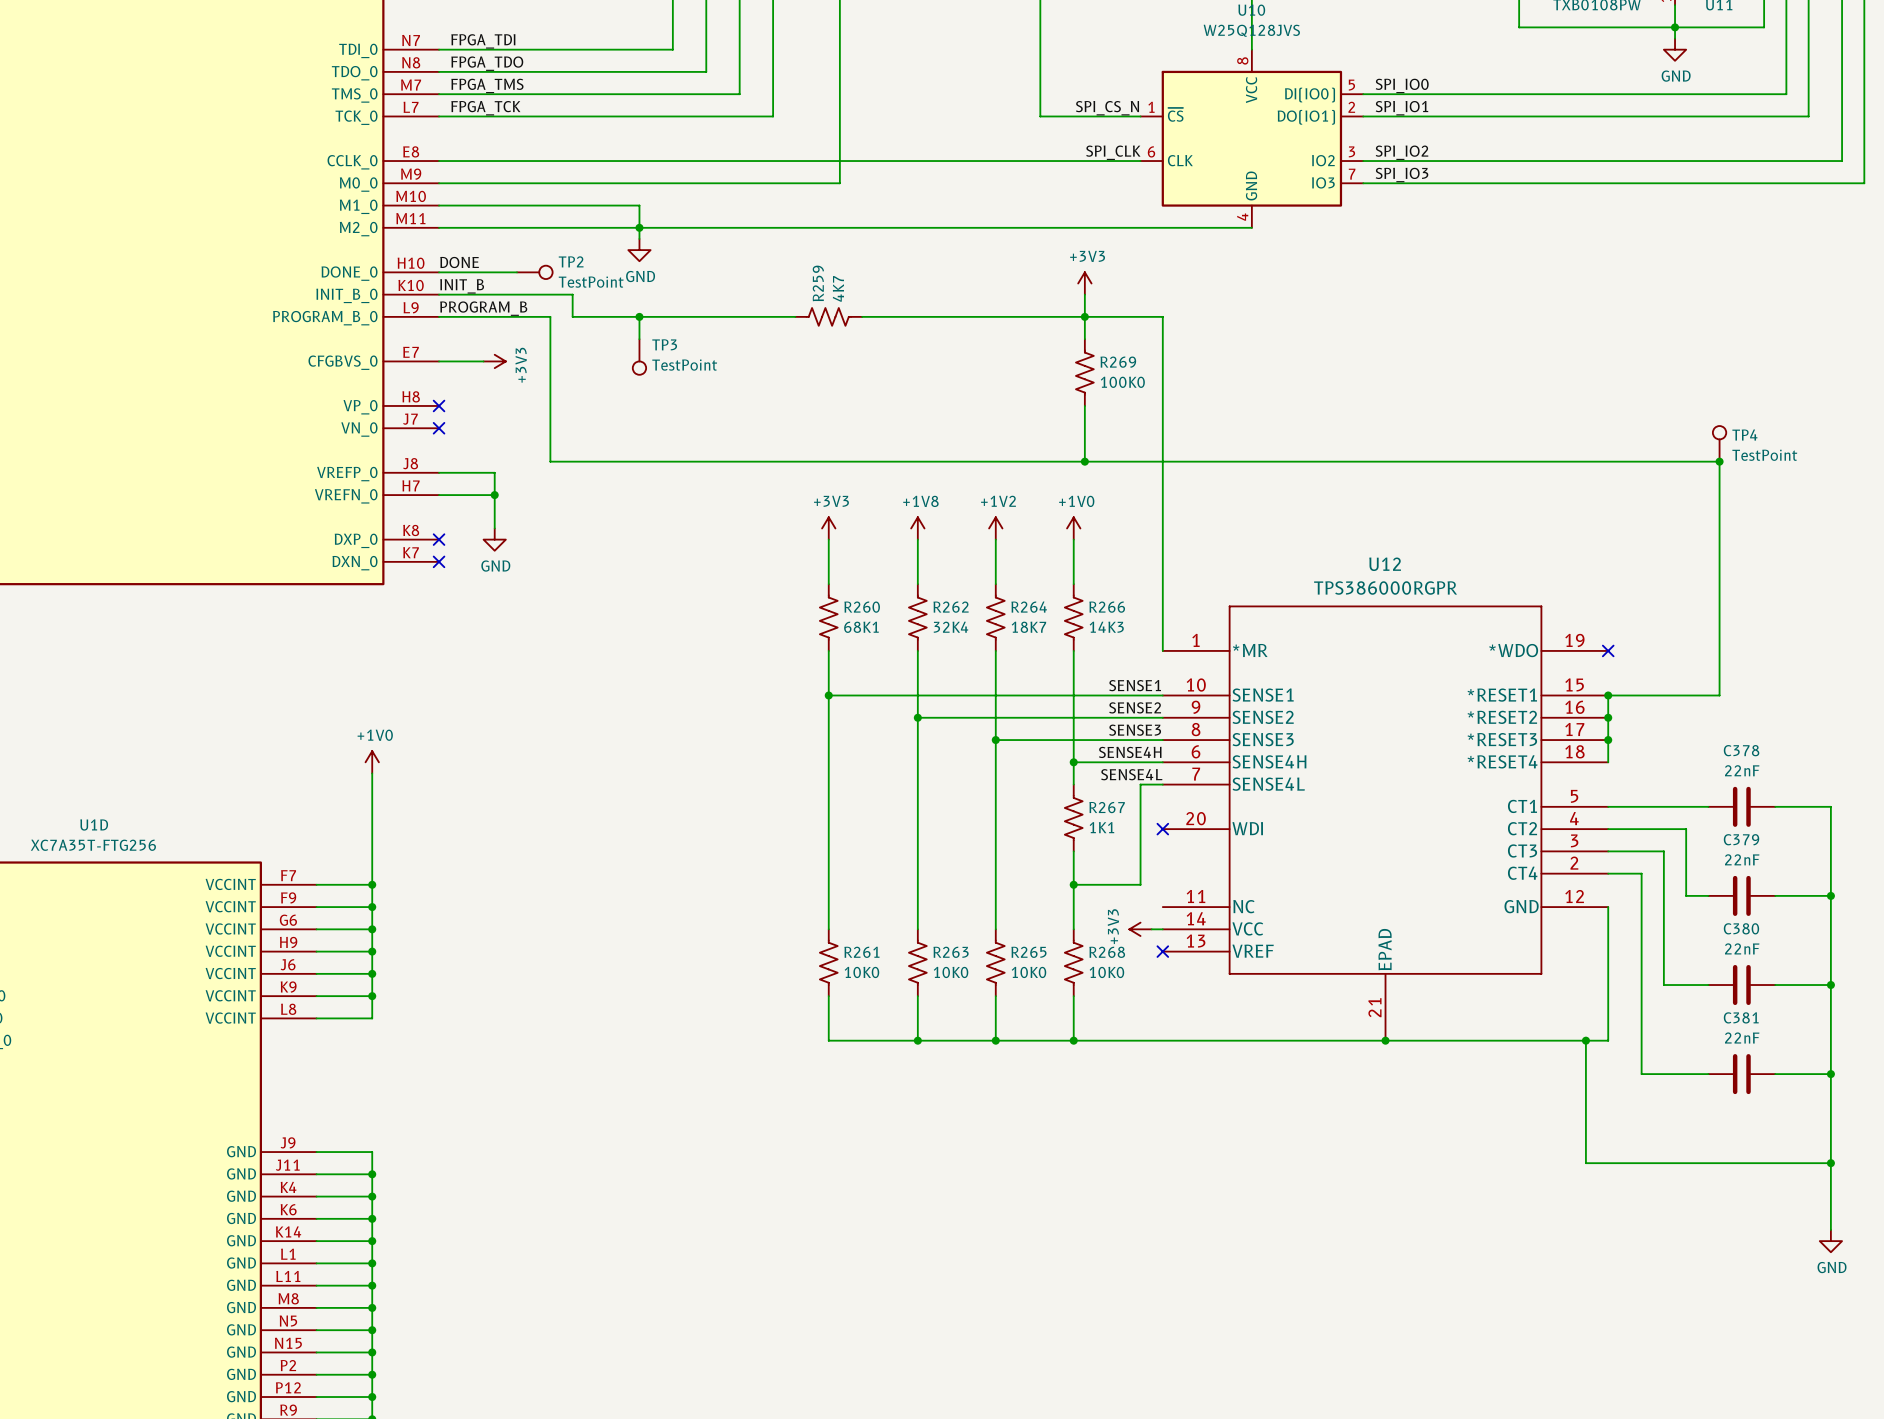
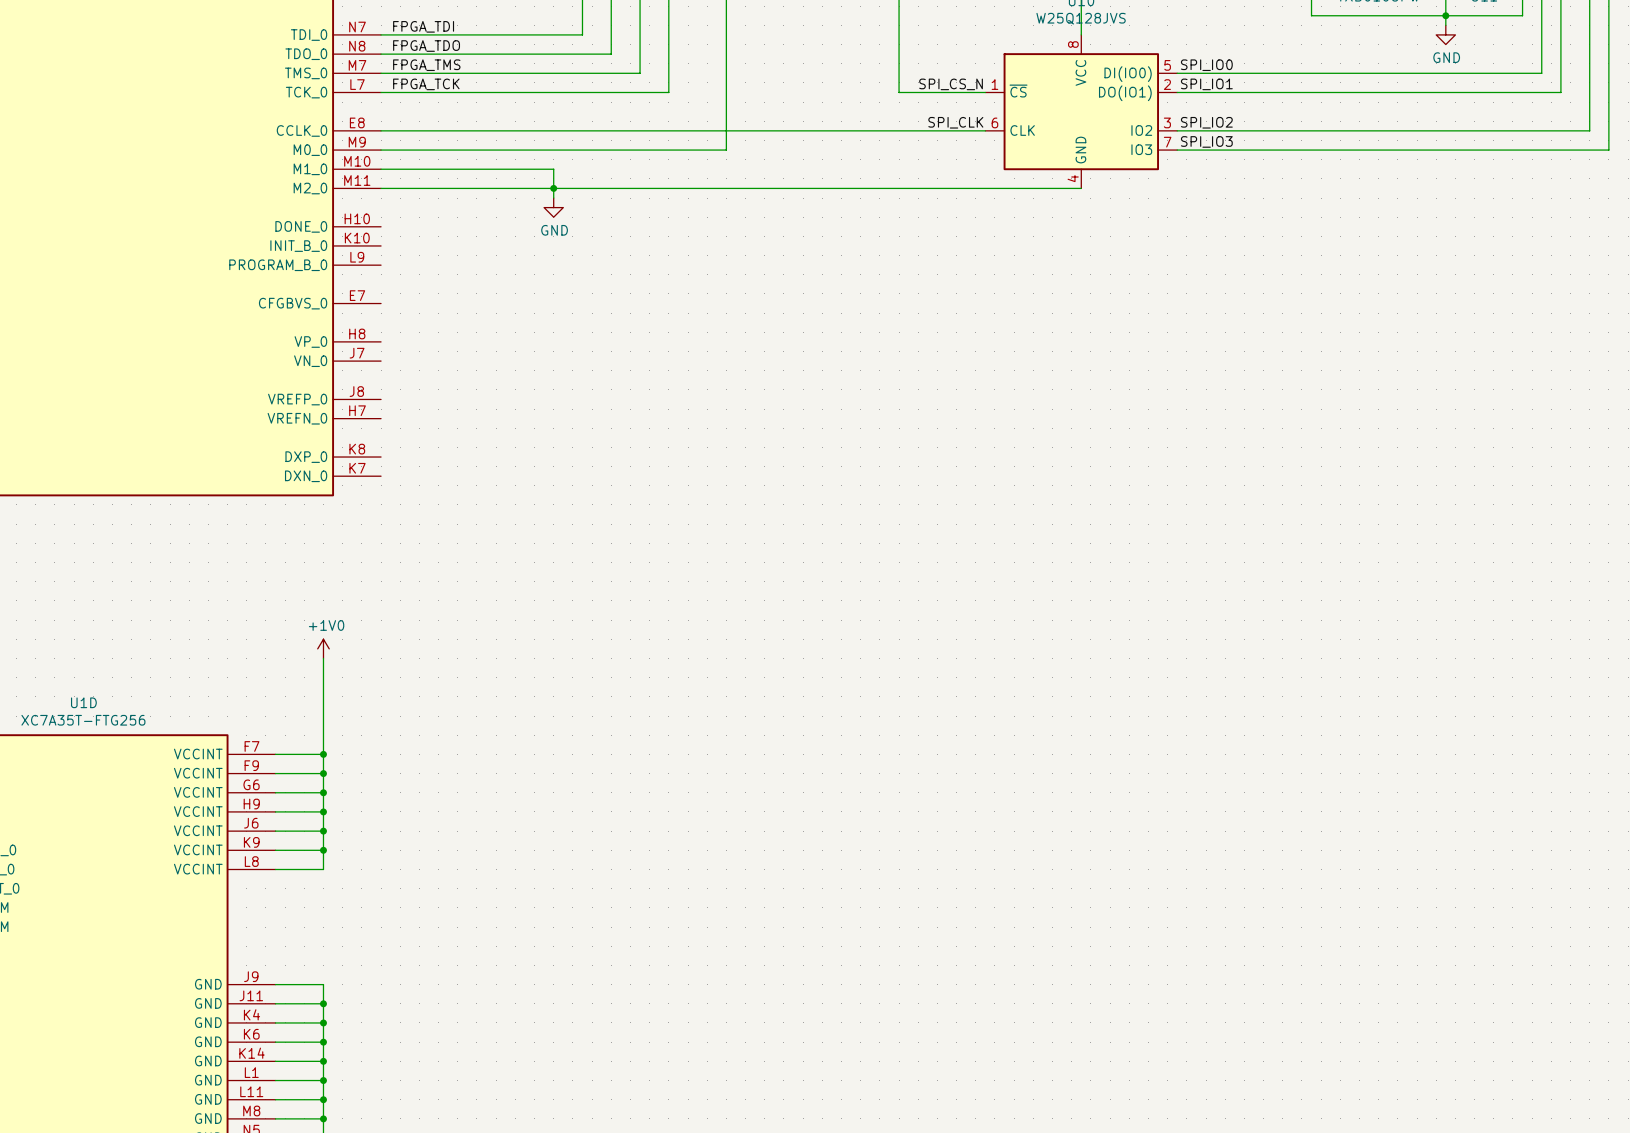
label: DONE (459, 262) -> none
wire: (439, 272) (516, 272) -> none
TP2: TestPoint (534, 272) -> none
power symbol: +3V3 (1084, 283) -> none
label: INIT_B (462, 286) -> none
wire: (439, 294) (572, 294) (572, 316) (795, 316) -> none
wire: (1084, 294) (1084, 339) -> none
label: PROGRAM_B (483, 308) -> none
wire: (439, 316) (550, 316) (550, 461) (1719, 461) (1719, 695) (1608, 695) (1608, 762) -> none
wire: (639, 316) (639, 339) -> none
junction: (639, 316) -> none
R259: 4K7 (828, 316) -> none
wire: (862, 316) (1162, 316) (1162, 650) -> none
junction: (1084, 316) -> none
TP3: TestPoint (639, 356) -> none
wire: (439, 361) (483, 361) -> none
power symbol: +3V3 (494, 361) -> none
R269: 100K0 (1084, 372) -> none
no-connect mark: (439, 405) -> none
wire: (1084, 405) (1084, 461) -> none
no-connect mark: (439, 428) -> none
TP4: TestPoint (1719, 443) -> none
junction: (1084, 461) -> none
junction: (1719, 461) -> none
wire: (439, 472) (494, 472) (494, 528) -> none
wire: (439, 495) (494, 495) -> none
junction: (494, 495) -> none
power symbol: +3V3 (828, 528) -> none
power symbol: +1V8 (917, 528) -> none
power symbol: +1V2 (995, 528) -> none
power symbol: +1V0 (1073, 528) -> none
no-connect mark: (439, 539) -> none
power symbol: GND (494, 539) -> none
wire: (828, 539) (828, 584) -> none
wire: (917, 539) (917, 584) -> none
wire: (995, 539) (995, 584) -> none
wire: (1073, 539) (1073, 584) -> none
no-connect mark: (439, 561) -> none
R260: 68K1 (828, 617) -> none
R262: 32K4 (917, 617) -> none
R264: 18K7 (995, 617) -> none
R266: 14K3 (1073, 617) -> none
wire: (828, 650) (828, 929) -> none
wire: (917, 650) (917, 929) -> none
wire: (995, 650) (995, 929) -> none
wire: (1073, 650) (1073, 784) -> none
no-connect mark: (1608, 650) -> none
label: SENSE1 (1135, 685) -> none
wire: (828, 695) (1162, 695) -> none
junction: (828, 695) -> none
junction: (1608, 695) -> none
label: SENSE2 (1135, 707) -> none
wire: (917, 717) (1162, 717) -> none
junction: (917, 717) -> none
junction: (1608, 717) -> none
label: SENSE3 (1135, 730) -> none
wire: (995, 740) (1162, 740) -> none
junction: (995, 740) -> none
junction: (1608, 740) -> none
label: SENSE4H (1130, 752) -> none
wire: (1073, 762) (1162, 762) -> none
junction: (1073, 762) -> none
label: SENSE4L (1131, 774) -> none
wire: (1162, 784) (1140, 784) (1140, 884) (1073, 884) -> none
wire: (1608, 806) (1708, 806) -> none
C378: 22nF (1741, 806) -> none
wire: (1775, 806) (1830, 806) (1830, 1229) -> none
R267: 1K1 (1073, 817) -> none
U12: TPS386000RGPR (1385, 823) -> none
no-connect mark: (1162, 829) -> none
wire: (1608, 829) (1686, 829) (1686, 895) (1708, 895) -> none
wire: (1073, 851) (1073, 929) -> none
wire: (1608, 851) (1663, 851) (1663, 985) (1708, 985) -> none
wire: (1608, 873) (1641, 873) (1641, 1074) (1708, 1074) -> none
junction: (1073, 884) -> none
C379: 22nF (1741, 895) -> none
wire: (1775, 895) (1830, 895) -> none
junction: (1830, 895) -> none
wire: (1608, 907) (1608, 1040) (828, 1040) (828, 996) -> none
power symbol: +3V3 (1140, 929) -> none
wire: (1151, 929) (1162, 929) -> none
no-connect mark: (1162, 951) -> none
R261: 10K0 (828, 962) -> none
R263: 10K0 (917, 962) -> none
R265: 10K0 (995, 962) -> none
R268: 10K0 (1073, 962) -> none
C380: 22nF (1741, 985) -> none
wire: (1775, 985) (1830, 985) -> none
junction: (1830, 985) -> none
wire: (917, 996) (917, 1040) -> none
wire: (995, 996) (995, 1040) -> none
wire: (1073, 996) (1073, 1040) -> none
junction: (917, 1040) -> none
junction: (995, 1040) -> none
junction: (1073, 1040) -> none
junction: (1385, 1040) -> none
wire: (1585, 1040) (1585, 1163) (1830, 1163) -> none
junction: (1585, 1040) -> none
C381: 22nF (1741, 1074) -> none
wire: (1775, 1074) (1830, 1074) -> none
junction: (1830, 1074) -> none
junction: (1830, 1163) -> none
power symbol: GND (1830, 1241) -> none

